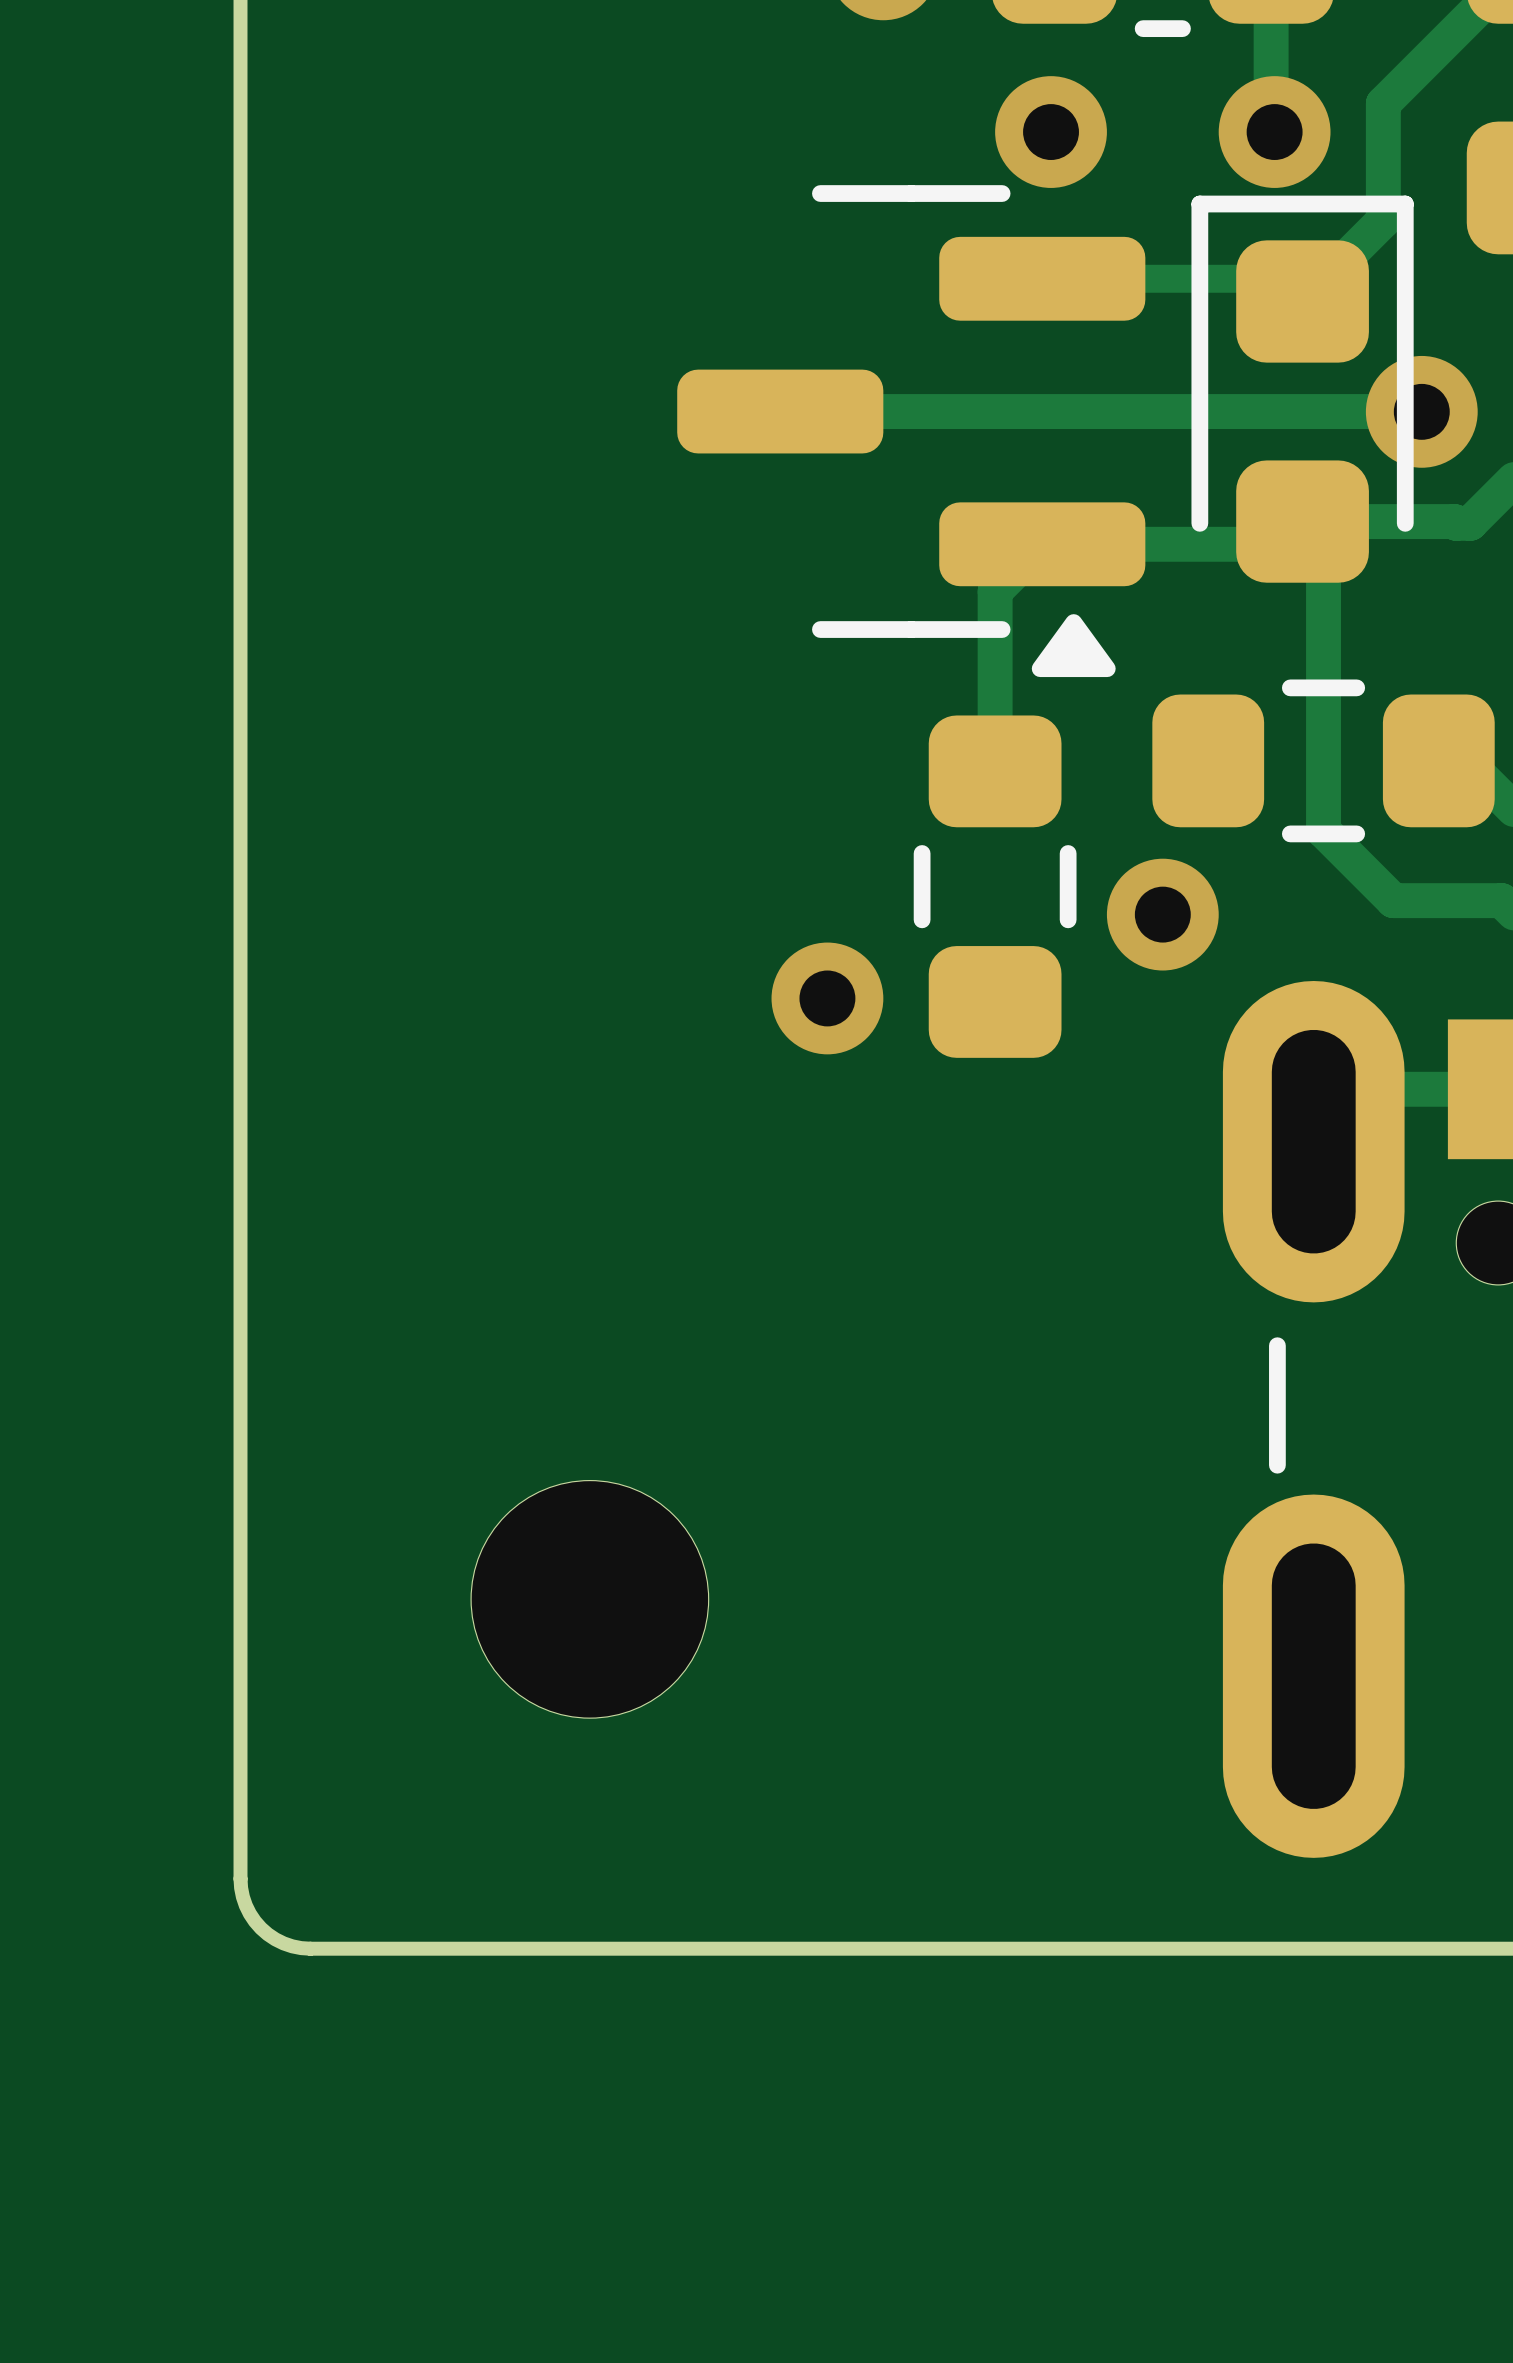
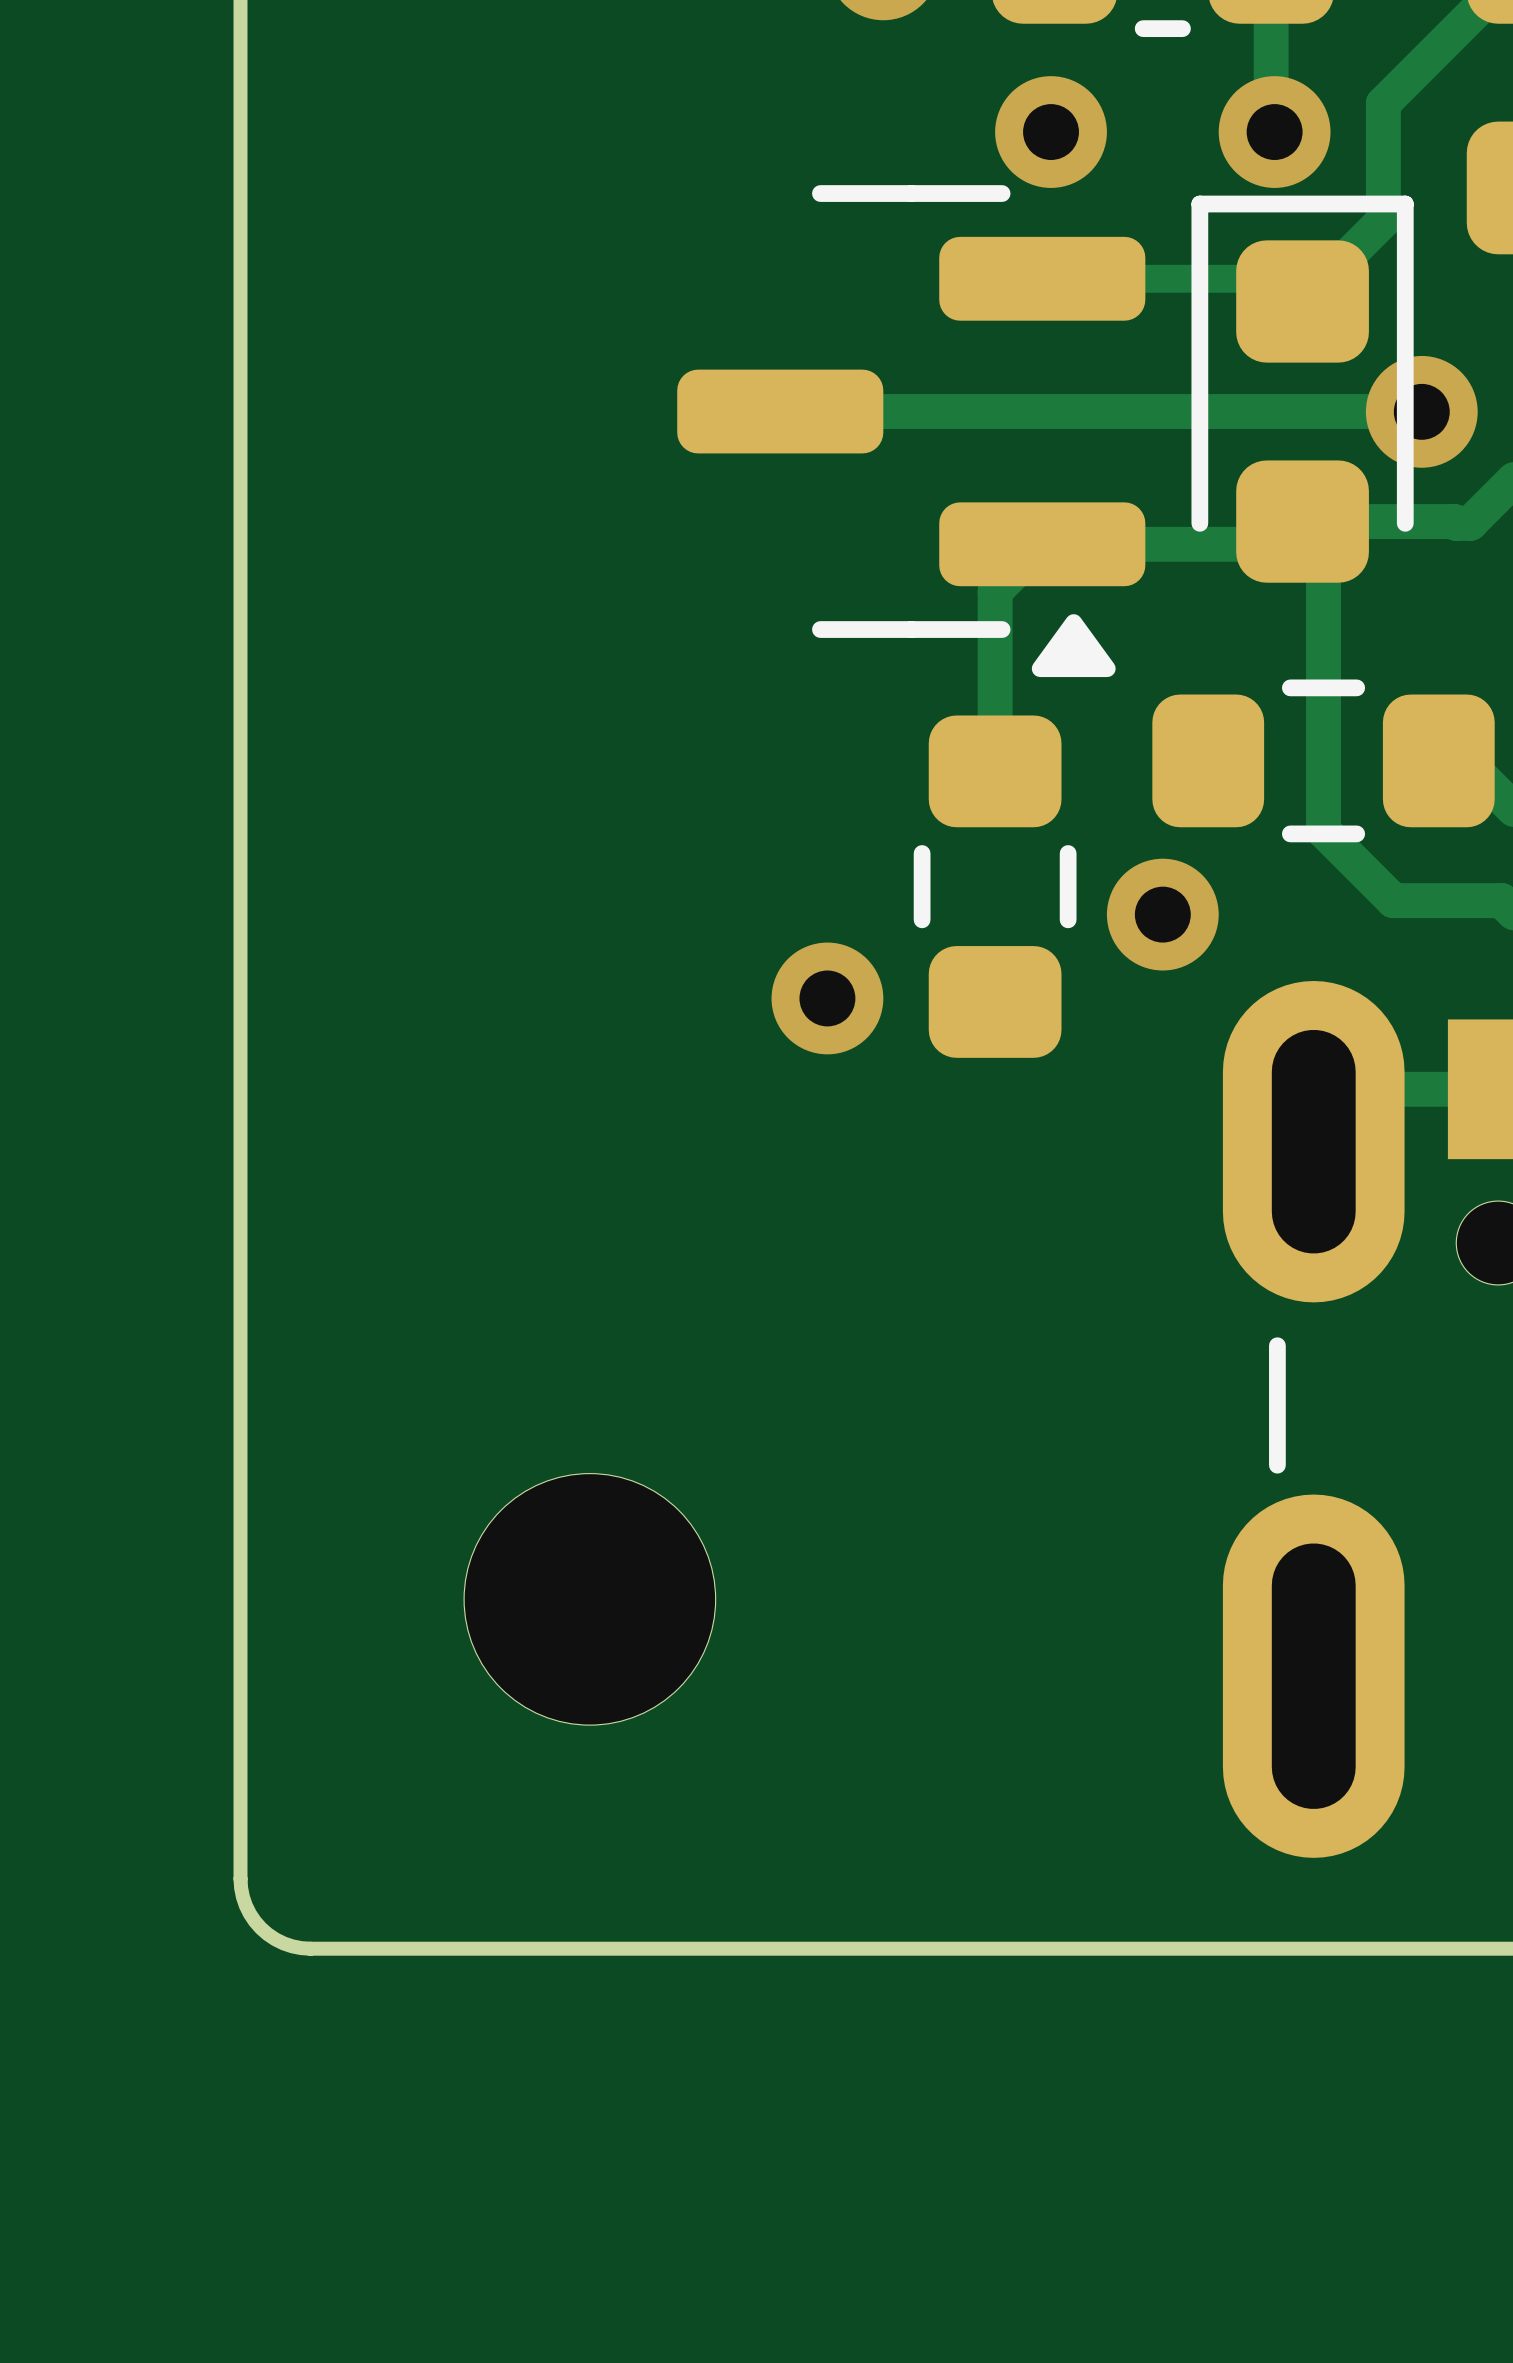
part footprint: [471, 1480, 709, 1719] -> [464, 1473, 716, 1726]

